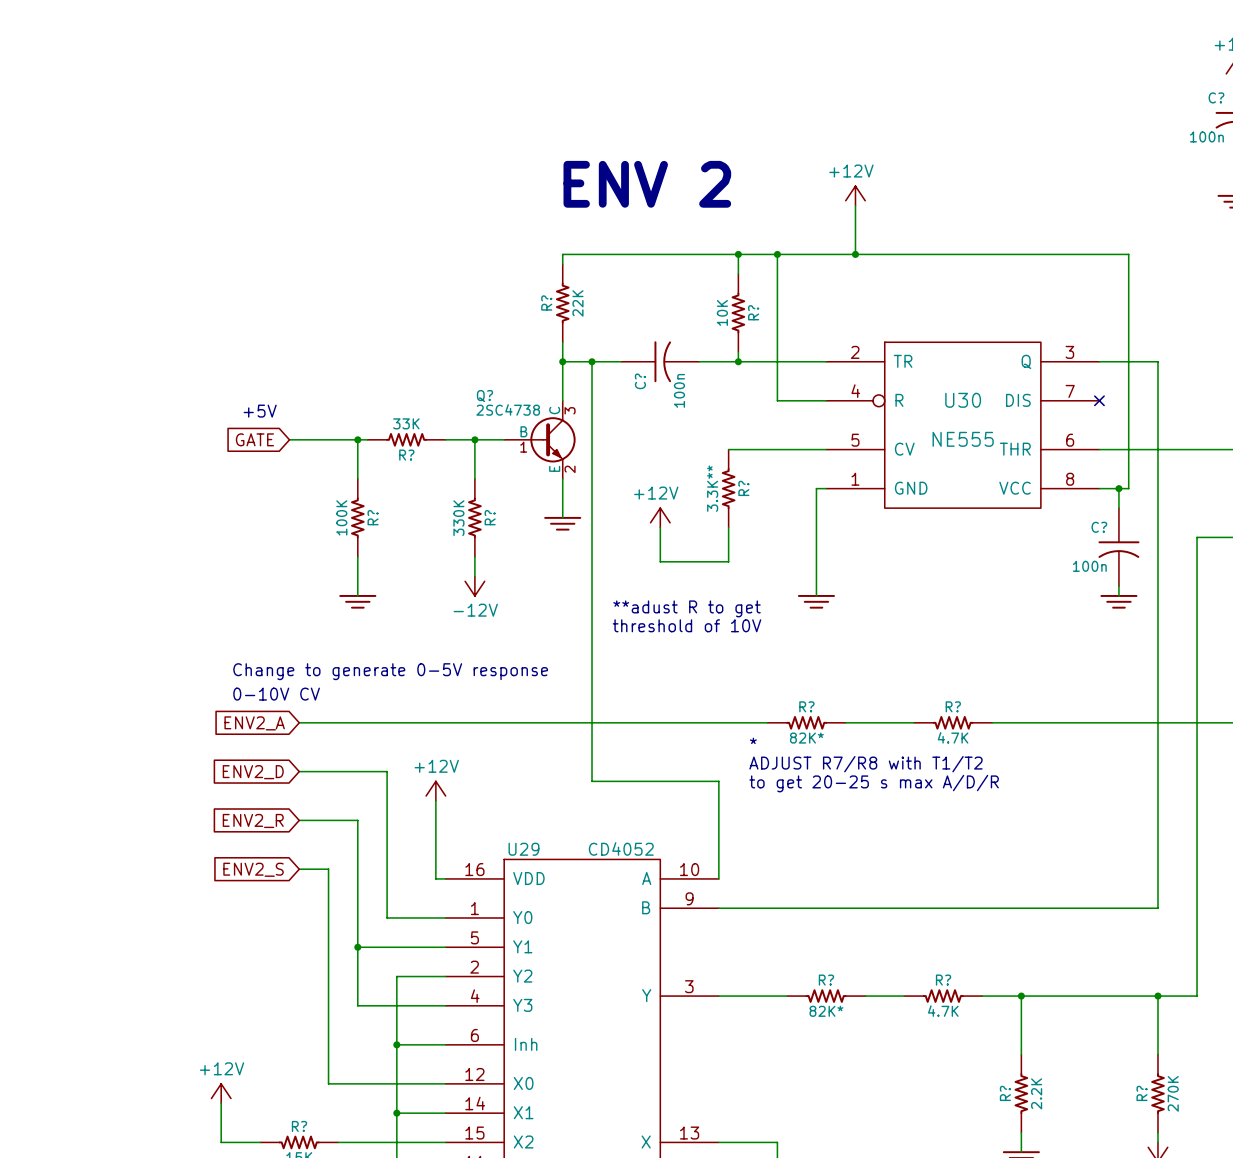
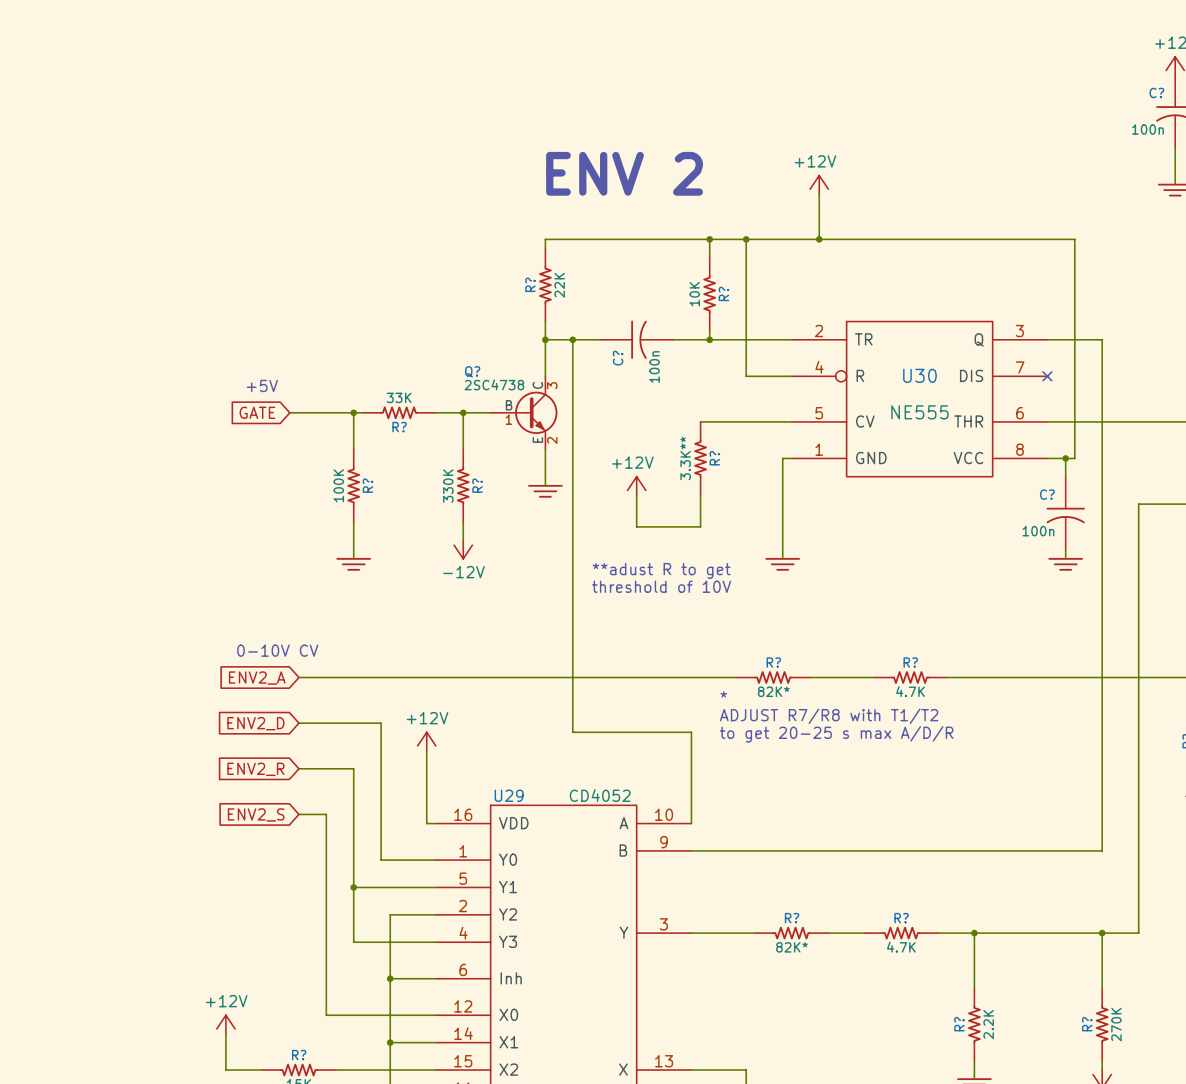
text: Change to generate 0-5V response (390, 671) -> none

